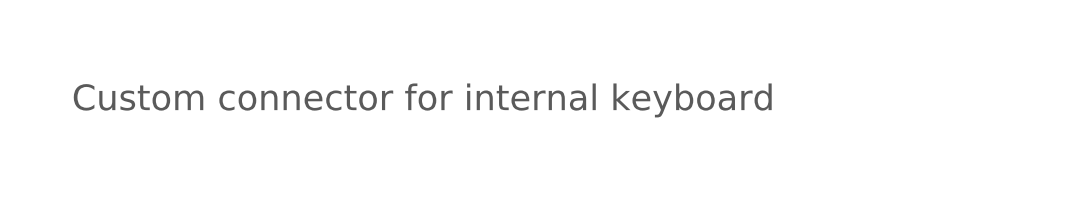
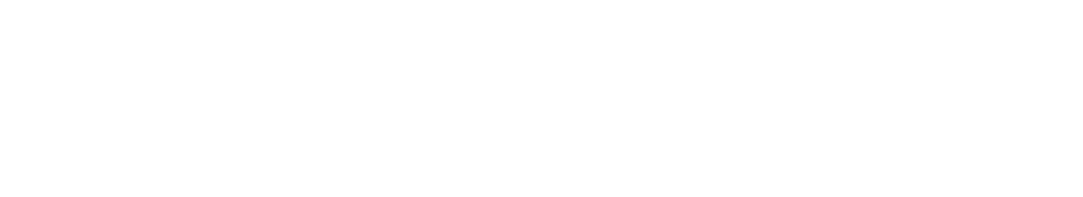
text: Custom connector for internal keyboard (422, 100) -> none

